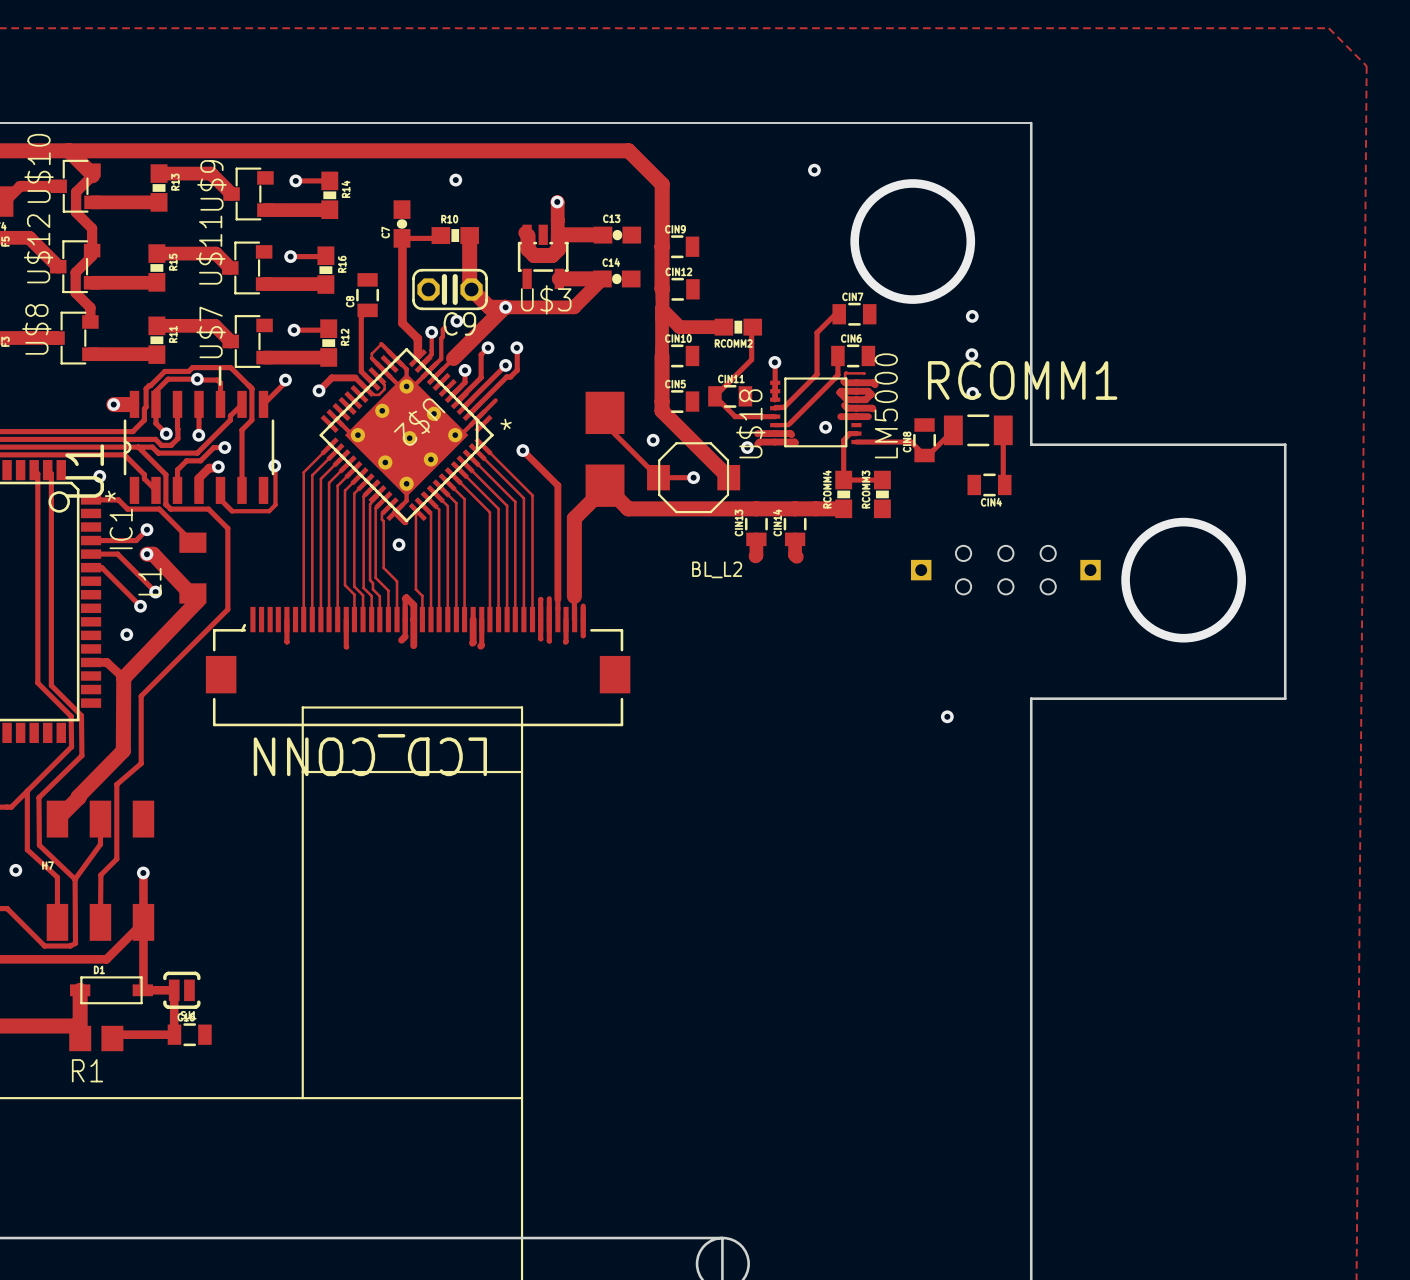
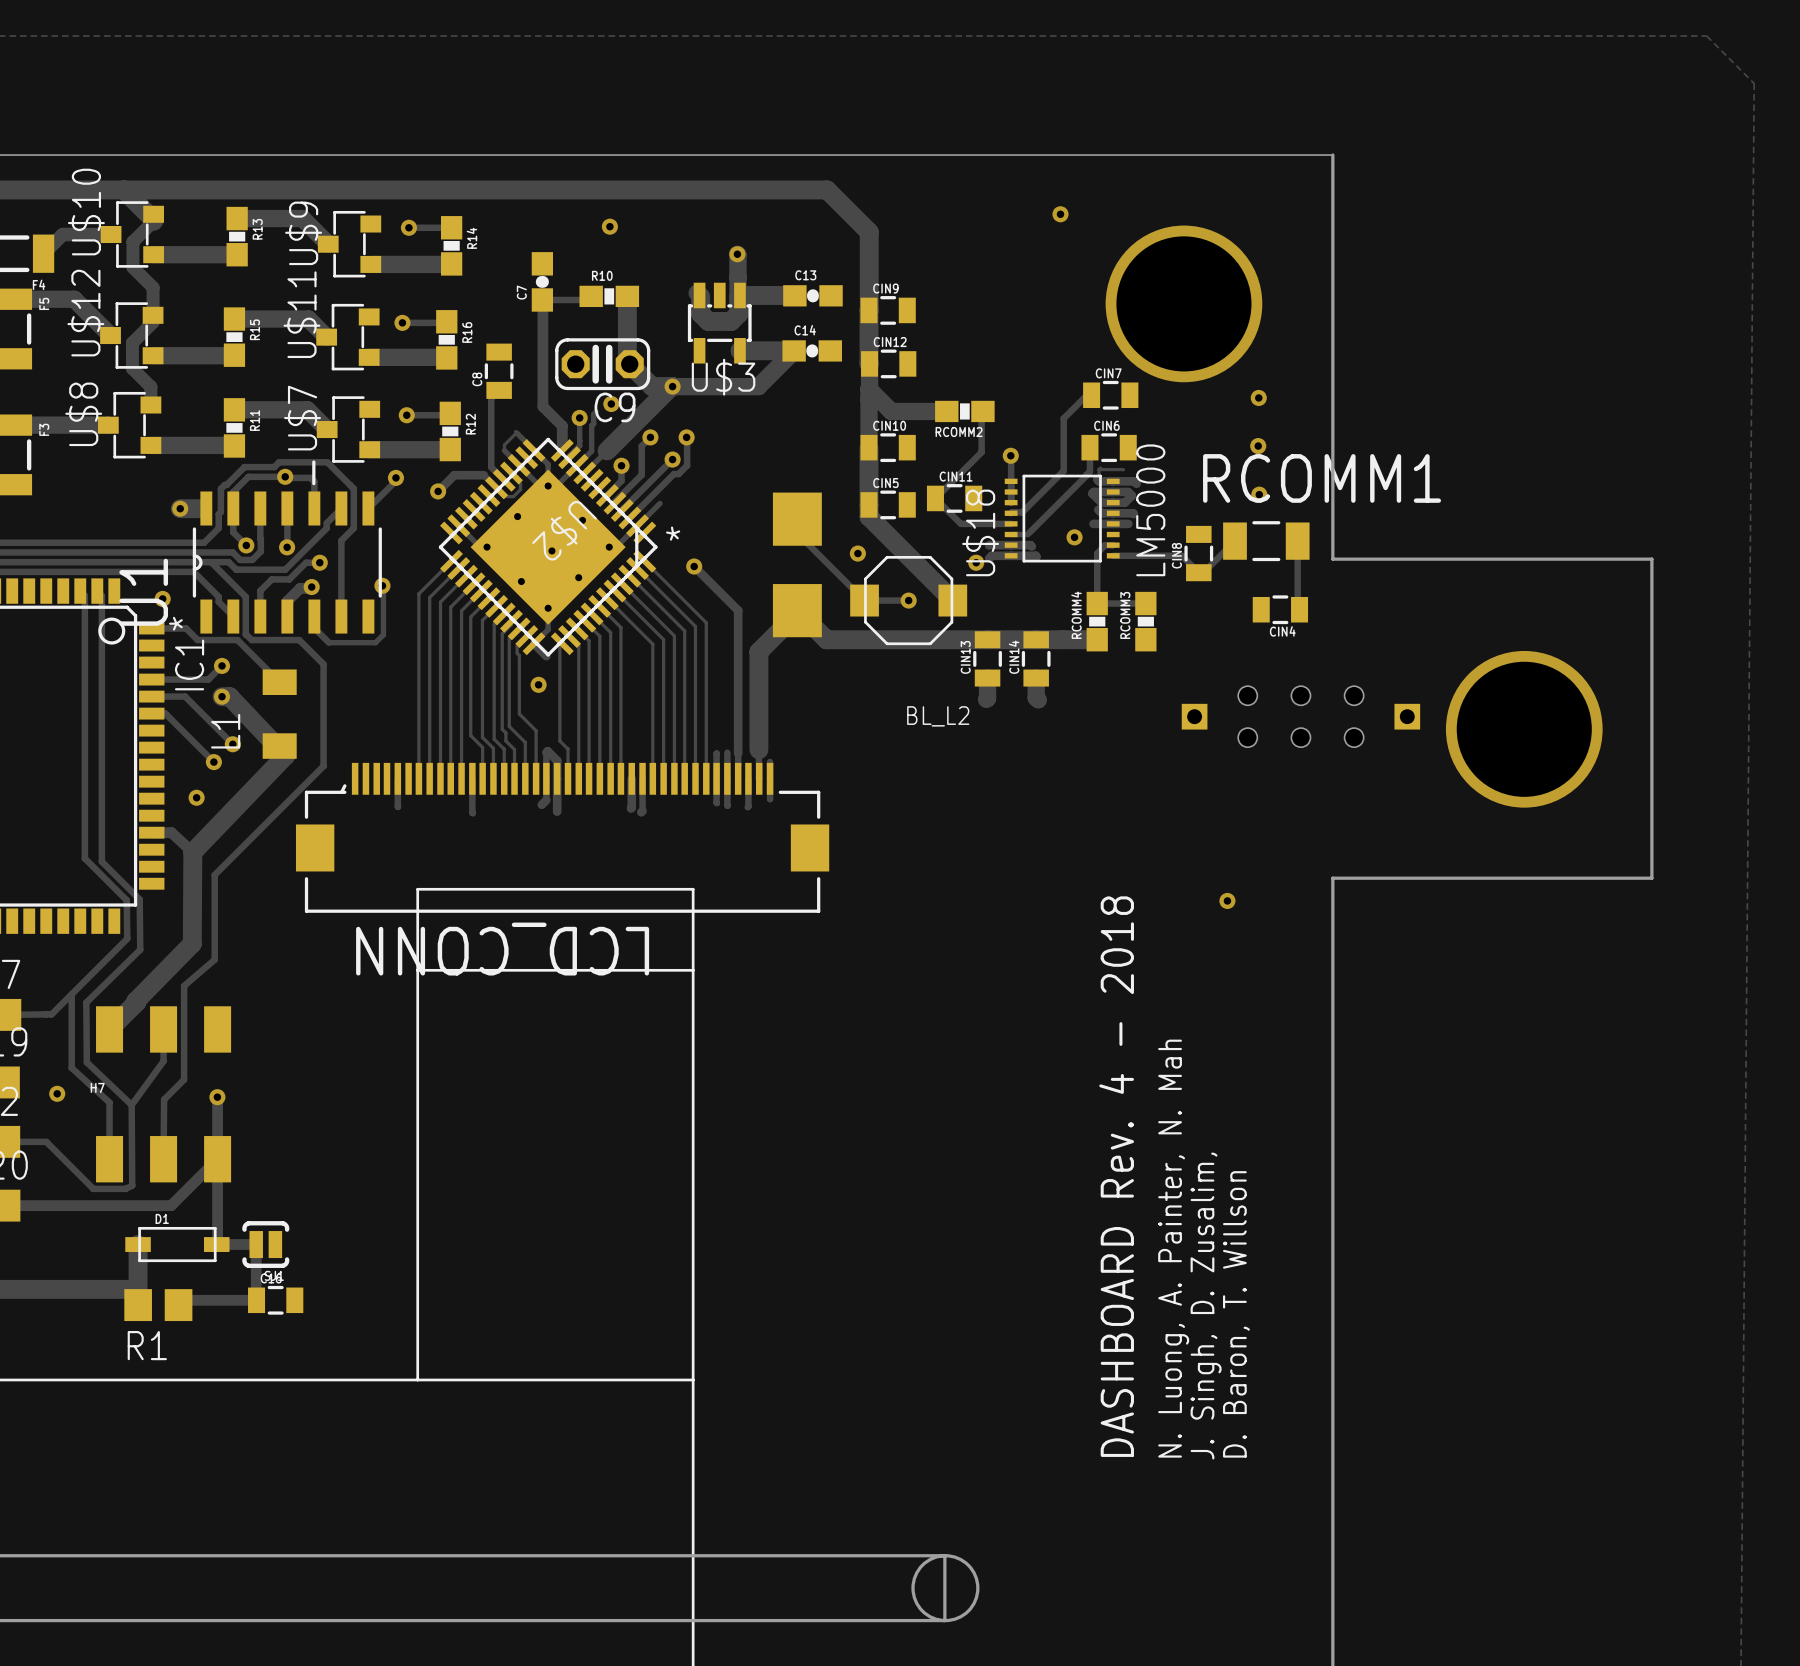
text: none -> DASHBOARD Rev. 4 - 2018 (1116, 1176)
text: none -> N. Luong, A. Painter, N. Mah (1173, 1248)
text: none -> J. Singh, D. Zusalim, (1206, 1306)
text: none -> D. Baron, T. Willson (1236, 1314)

